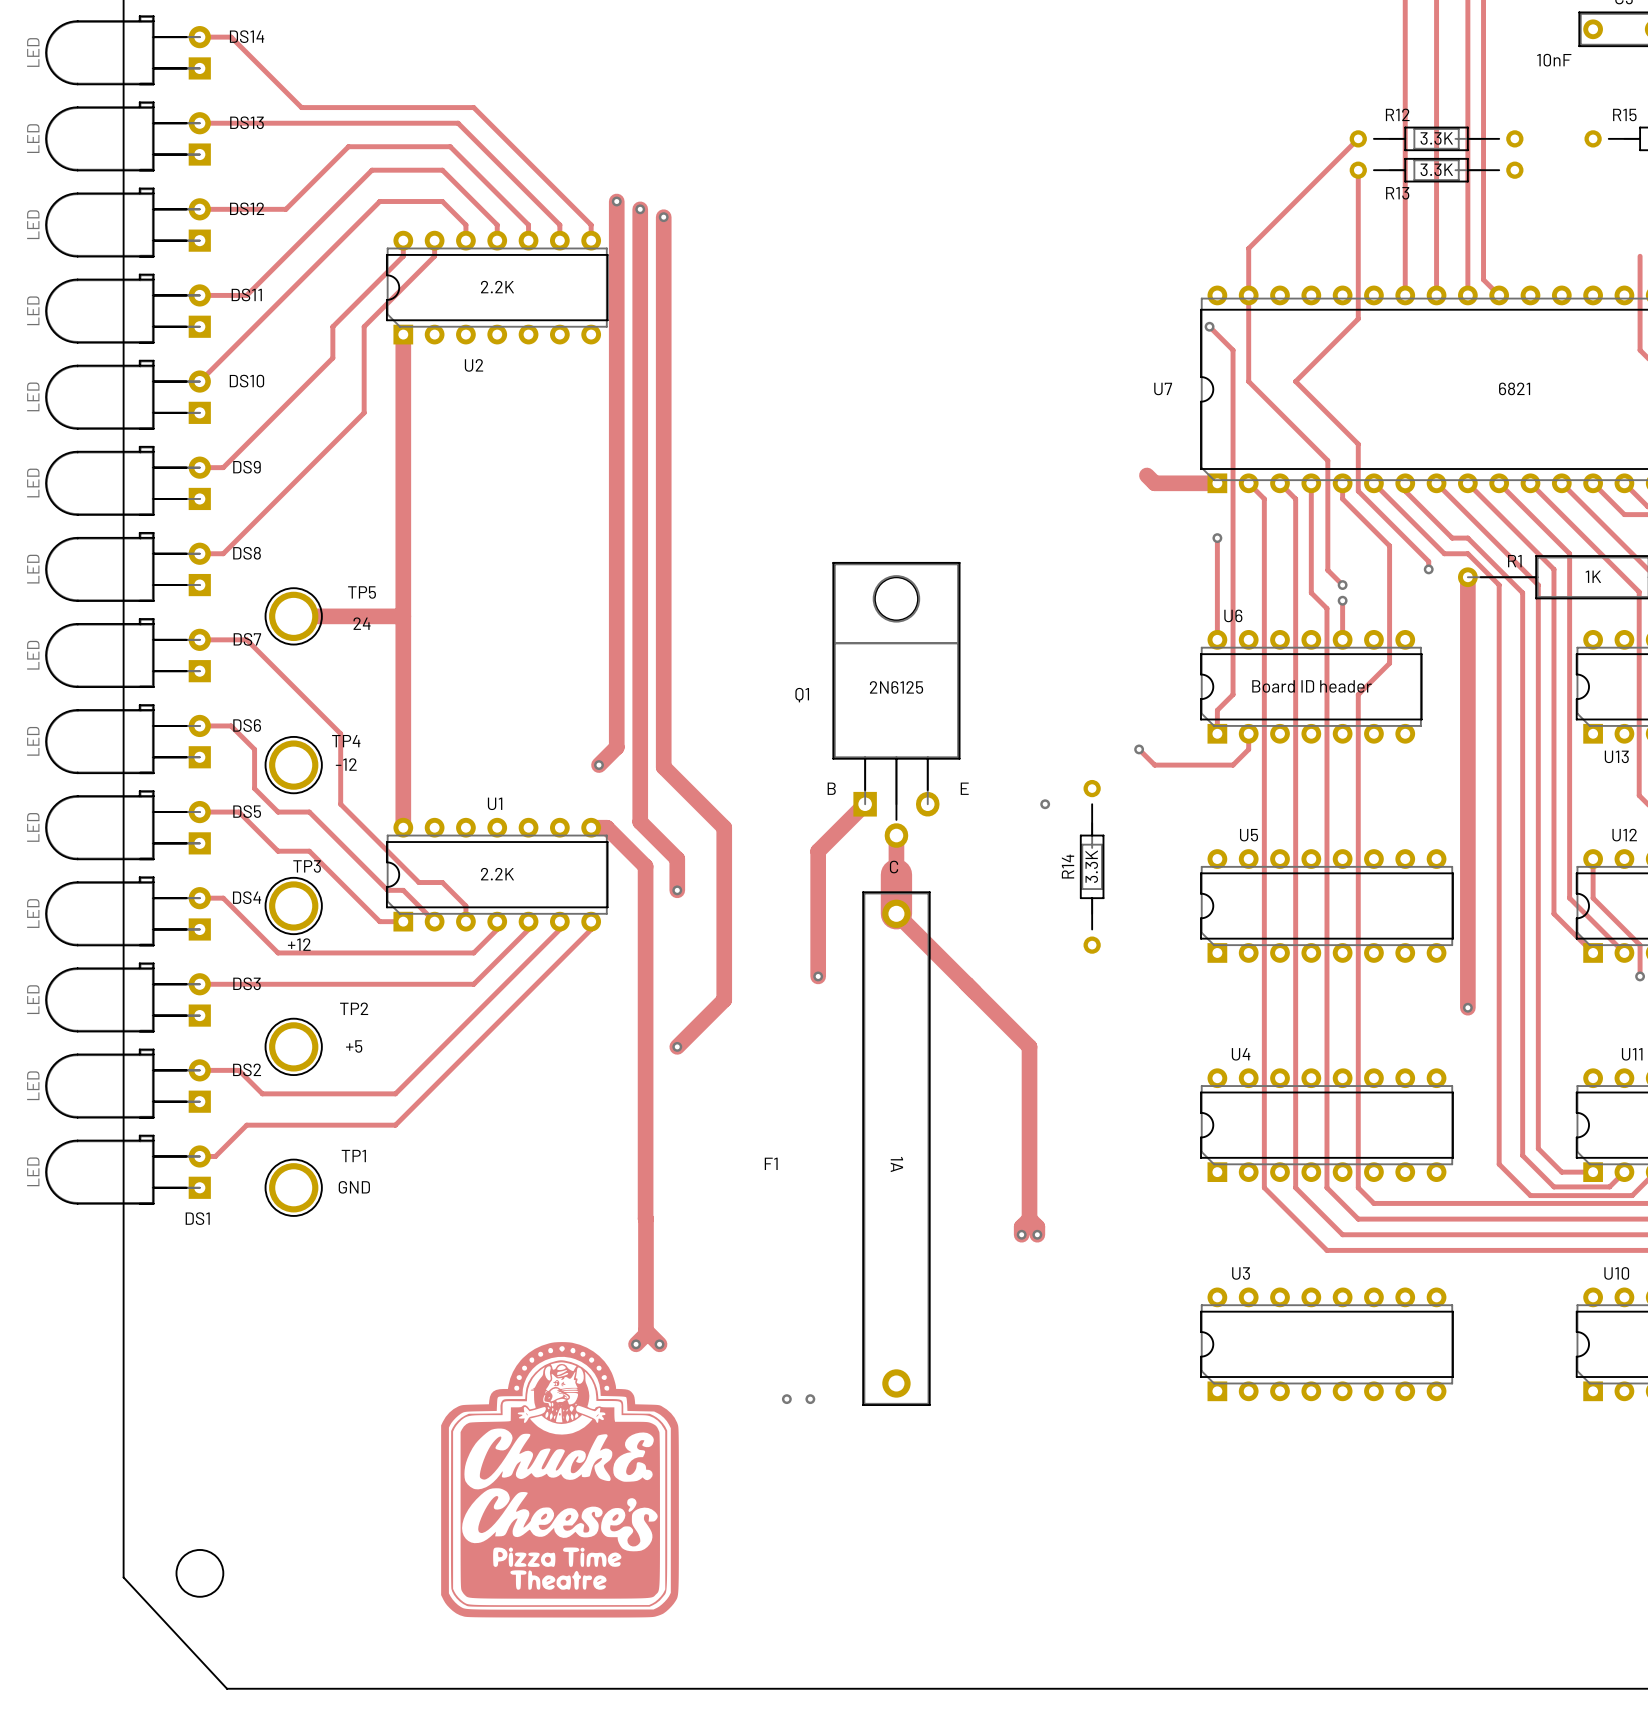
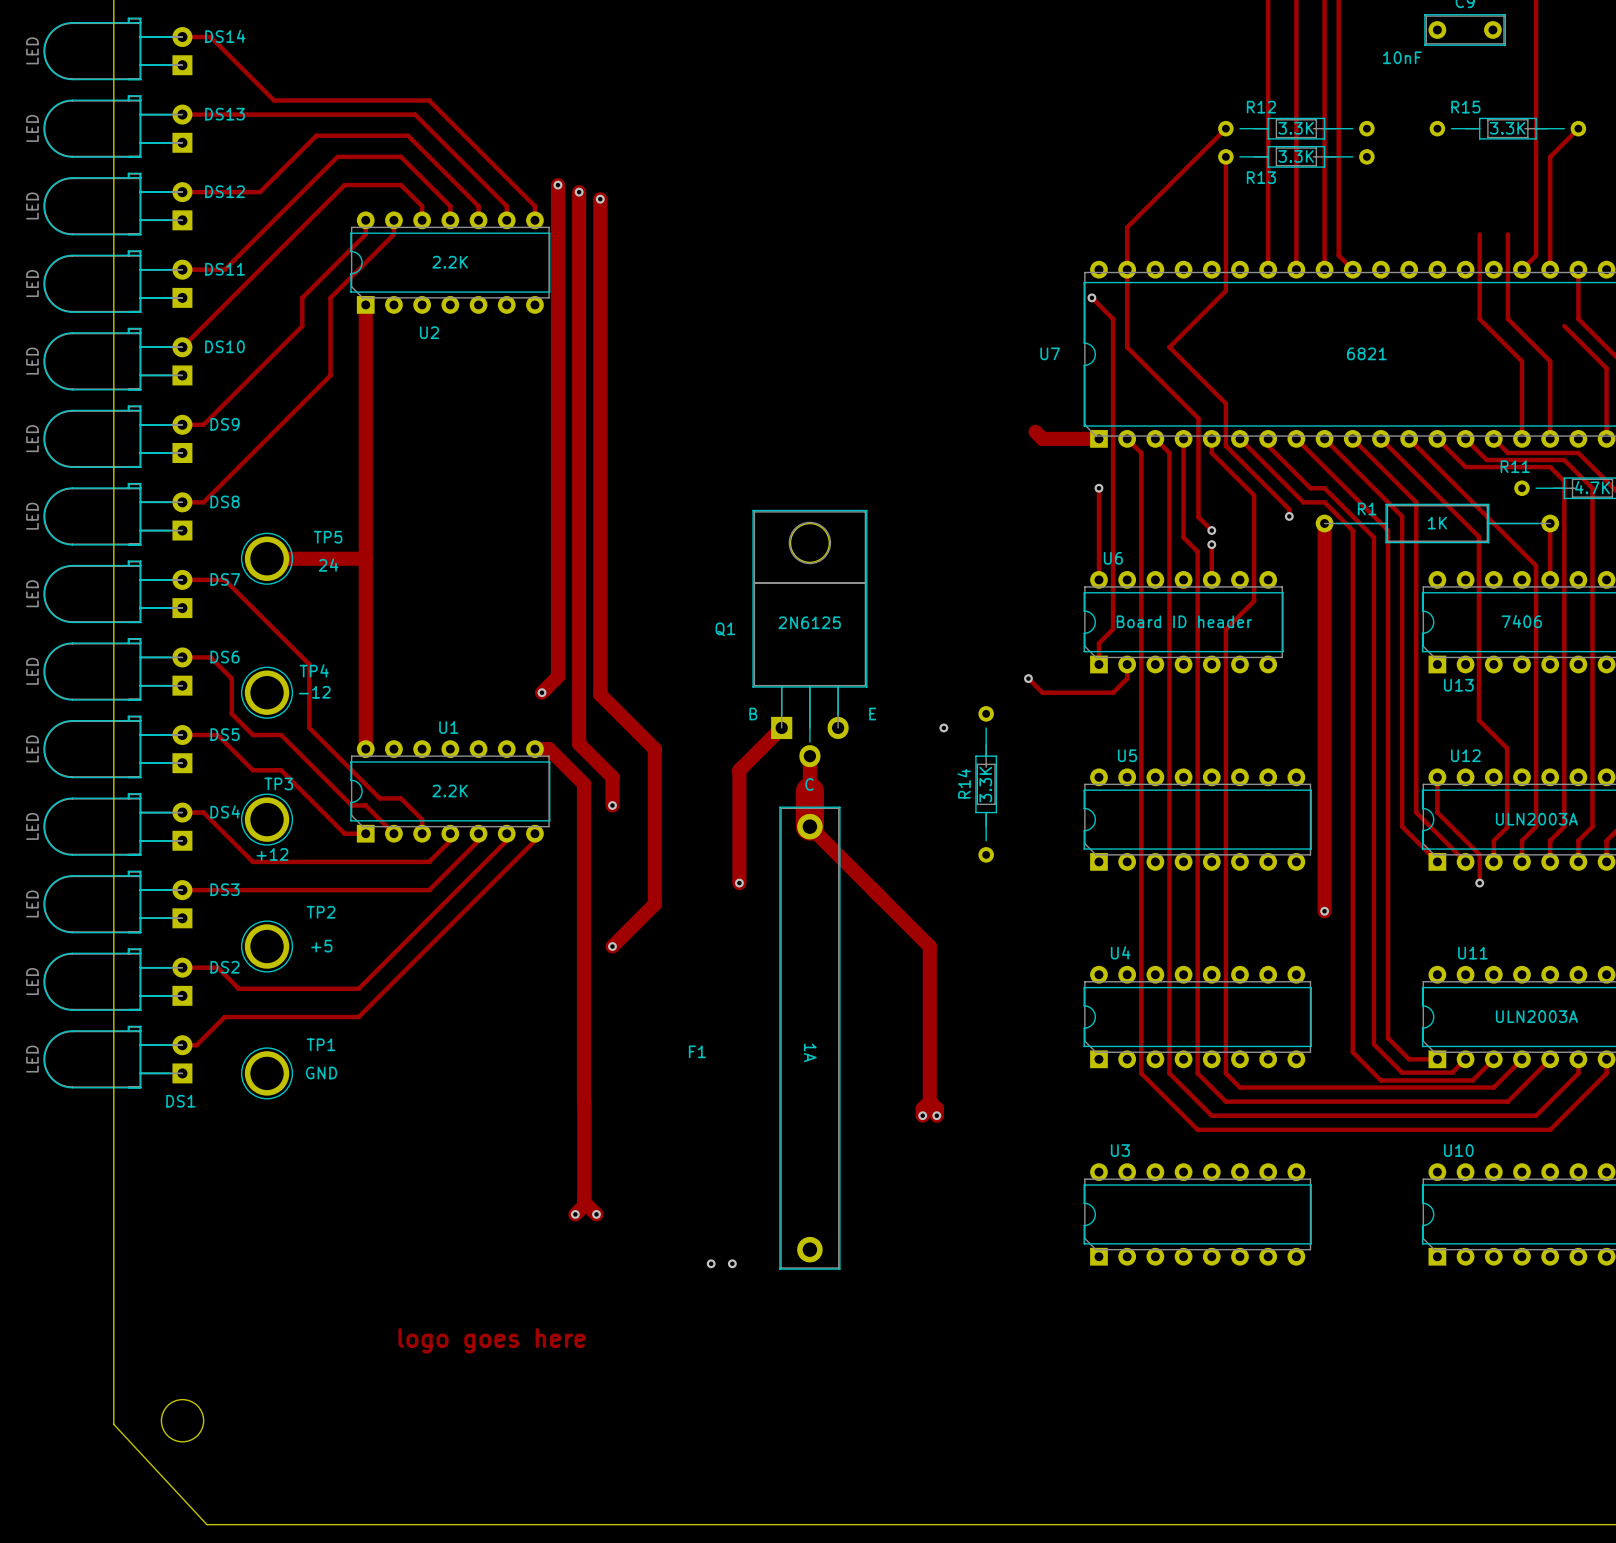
drawing: [441, 1342, 679, 1618] -> none
text: none -> logo goes here (492, 1340)

